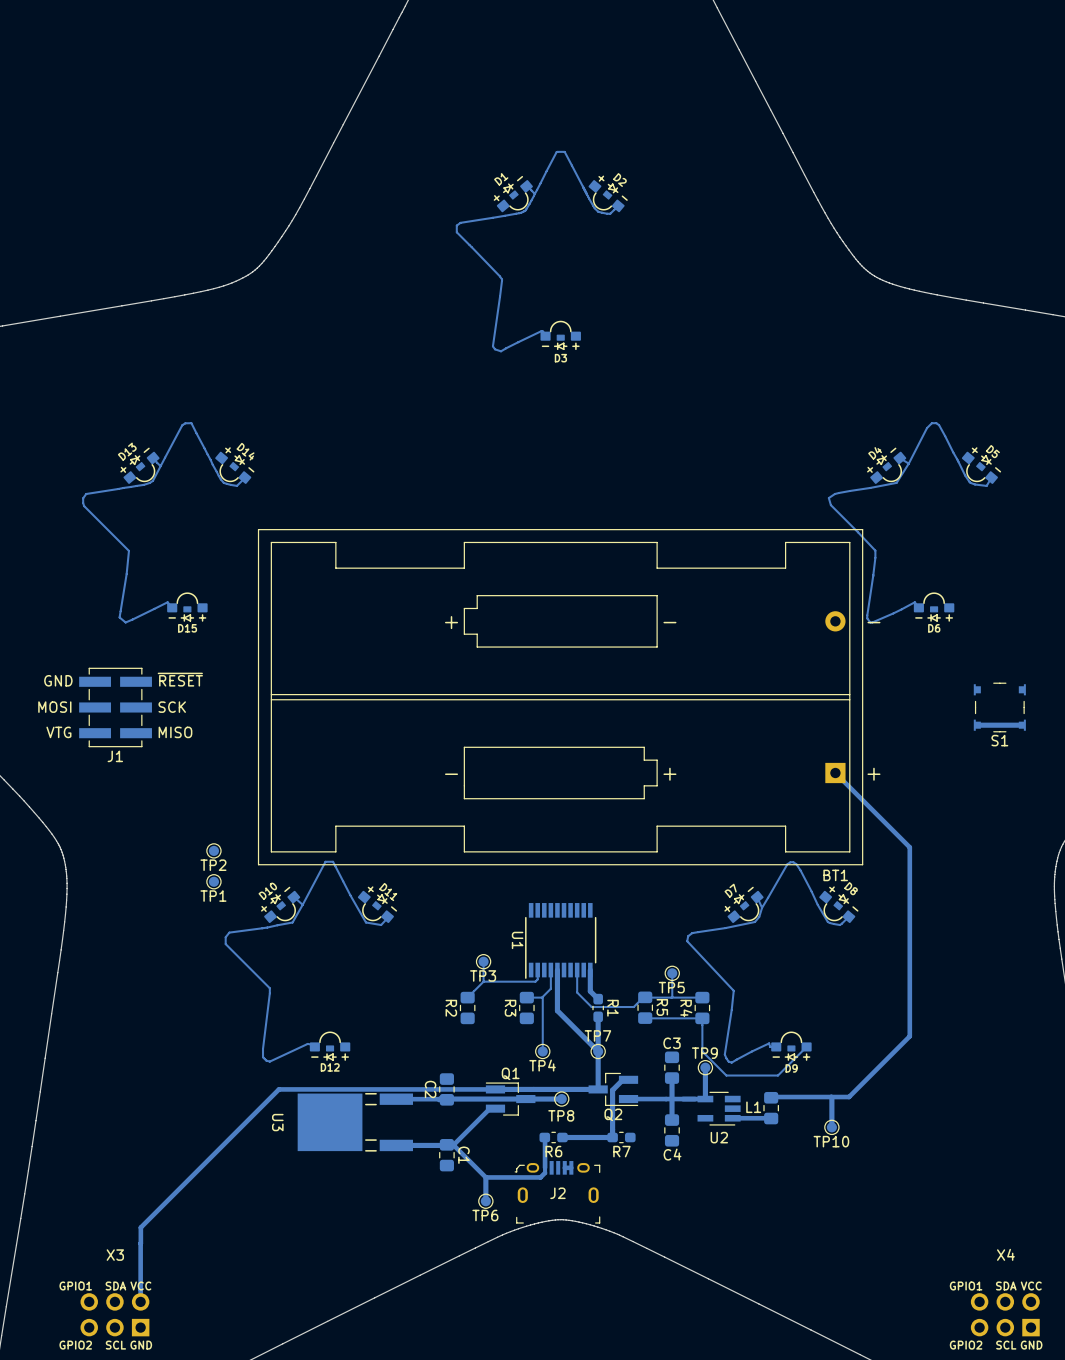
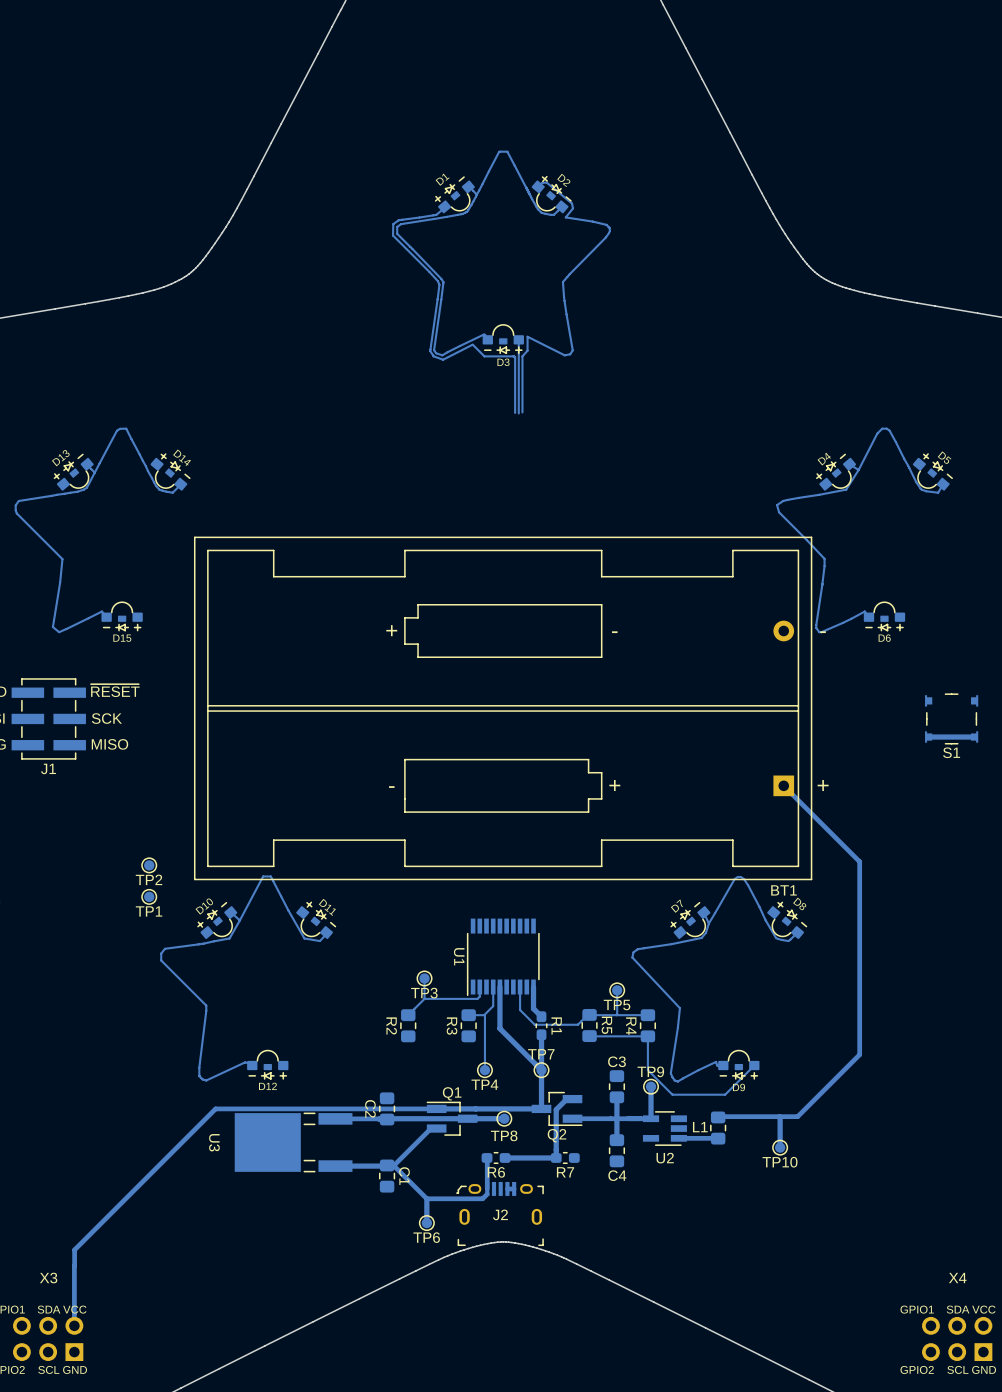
track: none -> (538, 186) (542, 182) (546, 182) (571, 203) (573, 208) (565, 217) (606, 224)
track: none -> (445, 207) (436, 214) (398, 220) (393, 224) (393, 235) (429, 271) (439, 284) (430, 350) (433, 356) (443, 359) (472, 344)
track: none -> (606, 224) (608, 226)
track: none -> (608, 227) (609, 230) (605, 237) (562, 282) (572, 350) (570, 354) (564, 355) (527, 336) (527, 350) (522, 356) (522, 412)
track: none -> (518, 339) (518, 413)
track: none -> (472, 344) (484, 356) (515, 357) (515, 412)

